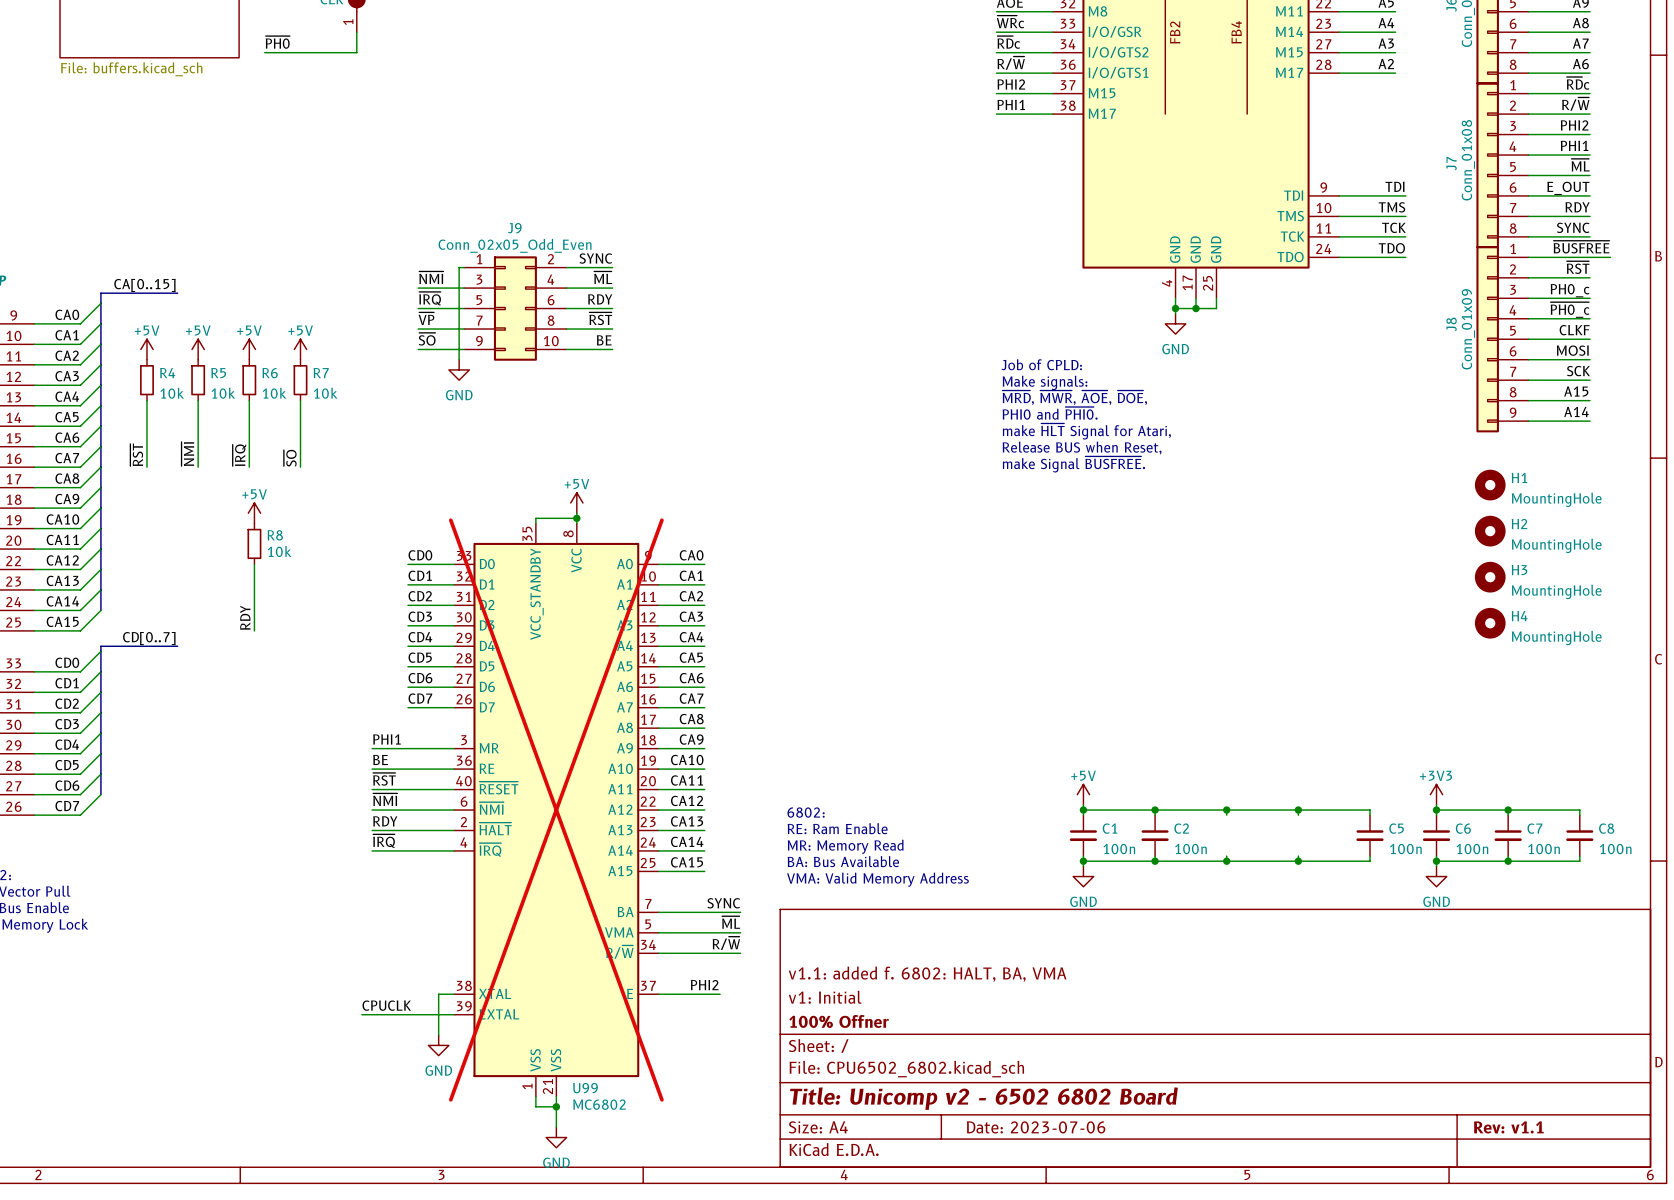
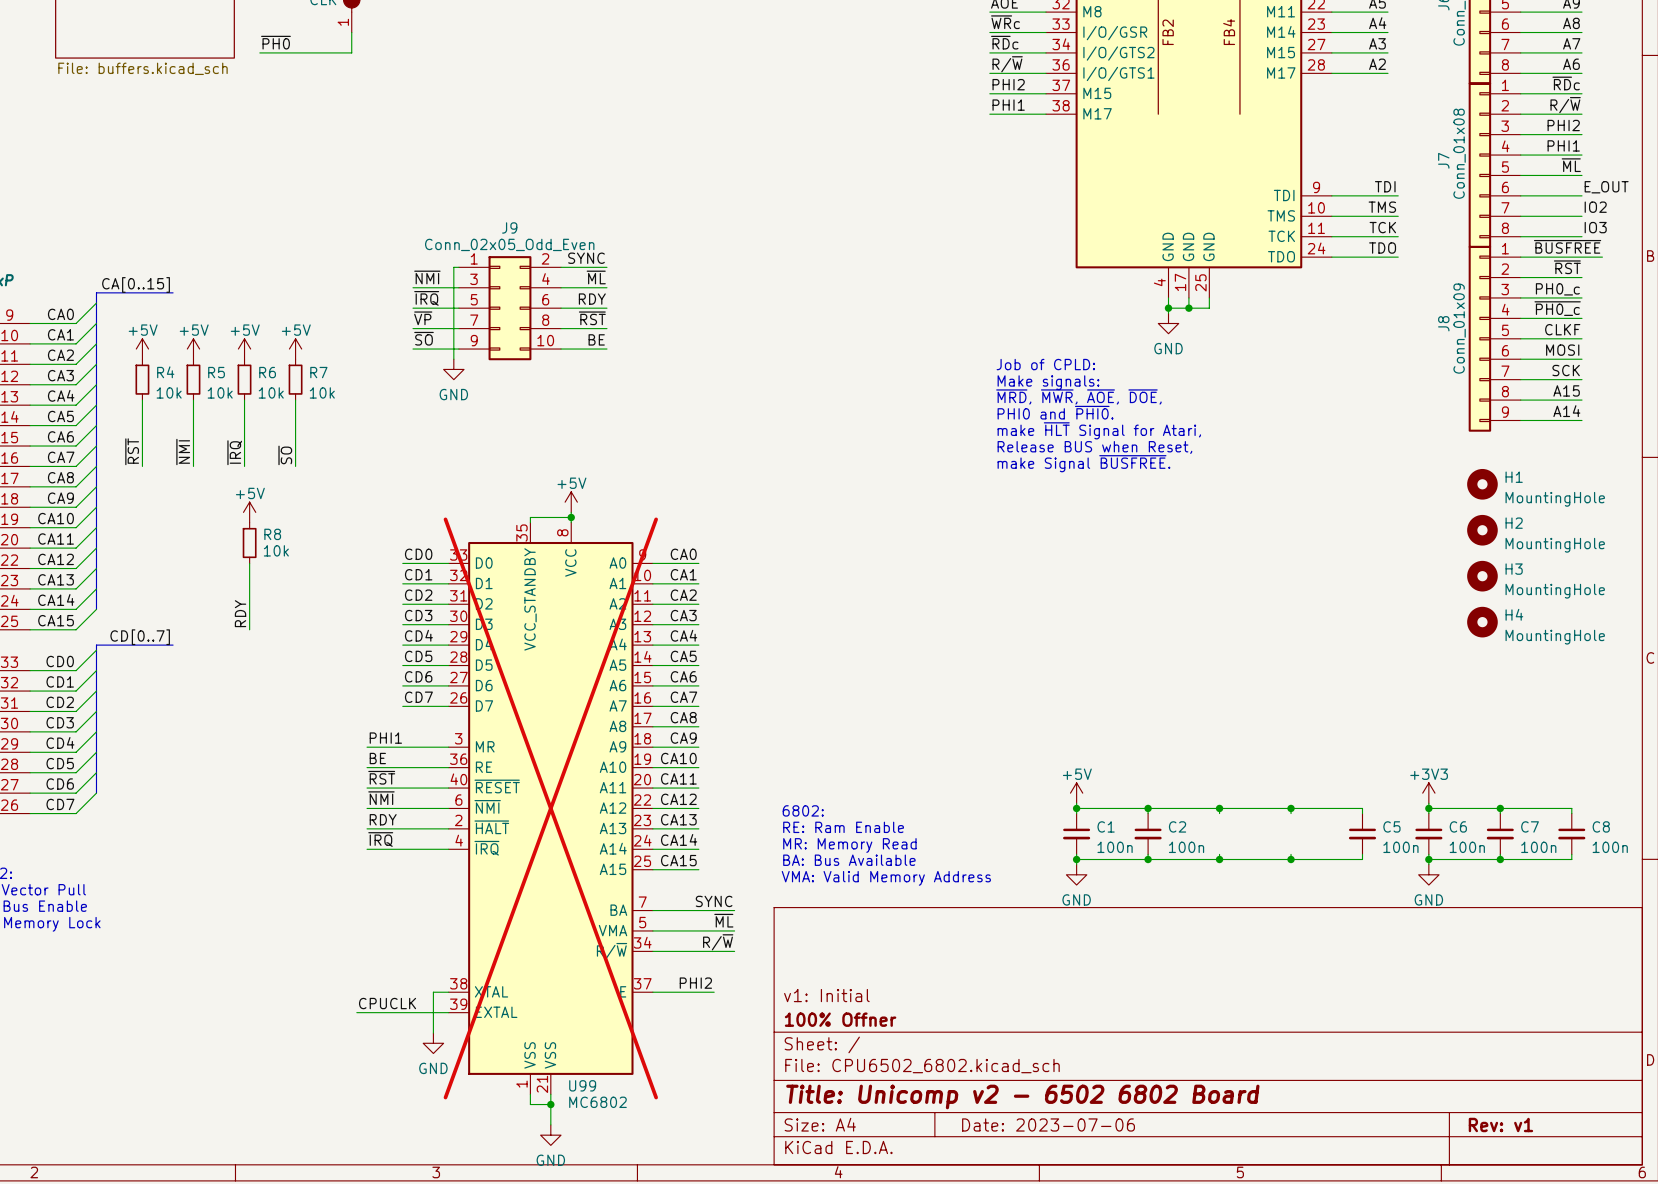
label position: E_OUT (1568, 188) -> E_OUT (1606, 187)
label: RDY (1577, 207) -> IO2 (1595, 207)
label: SYNC (1573, 227) -> IO3 (1595, 227)
title block: v1.1: added f. 6802: HALT, BA, VMA (927, 974) -> none
title block: Rev: v1.1 (1508, 1127) -> Rev: v1 (1500, 1124)

